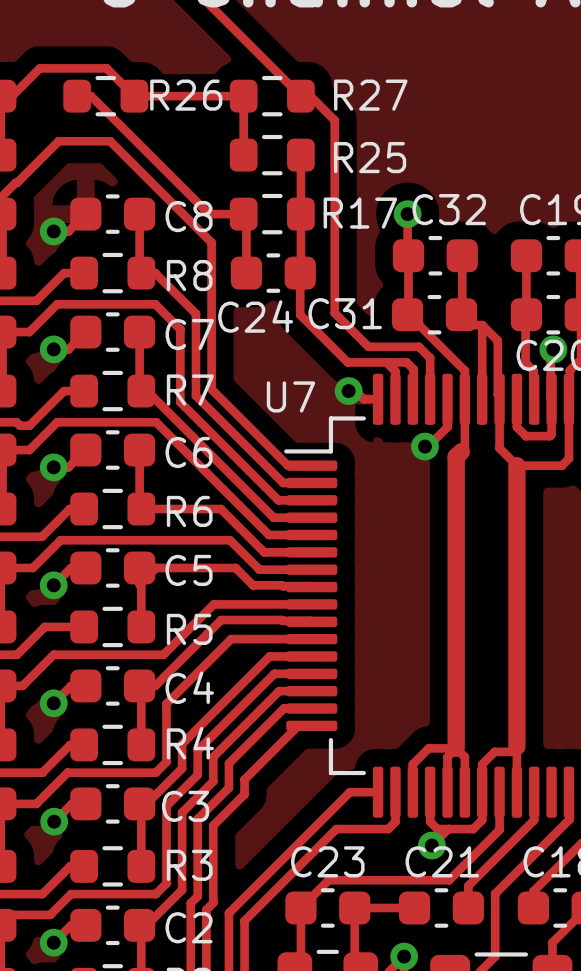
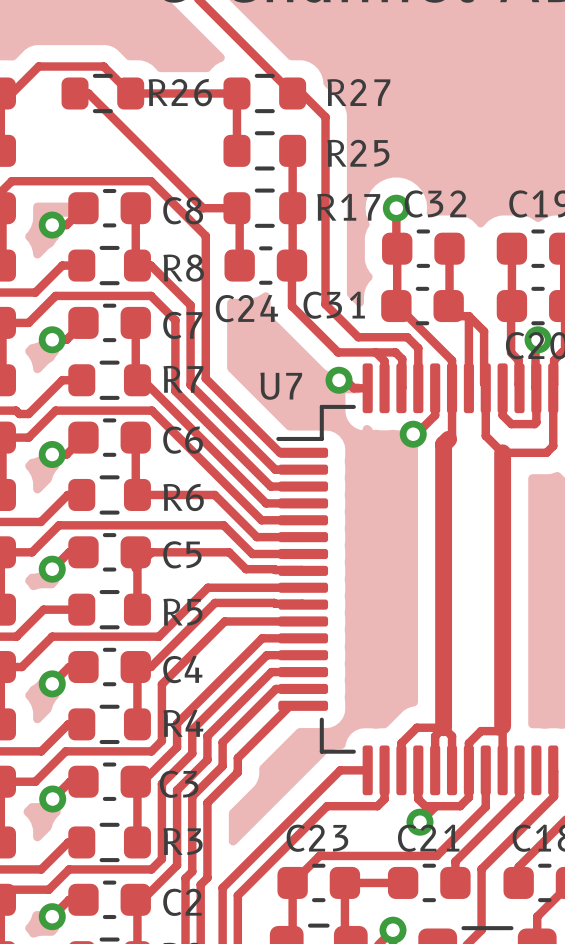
track: (12, 186) (58, 141) (110, 141) (155, 186) -> (11, 181) (151, 181)

